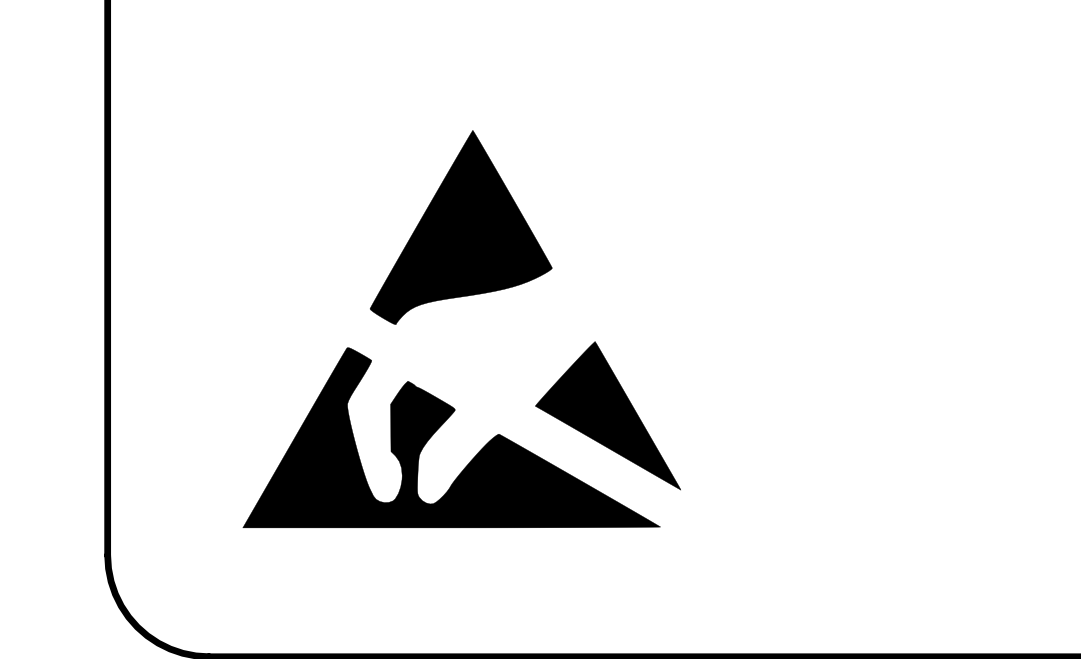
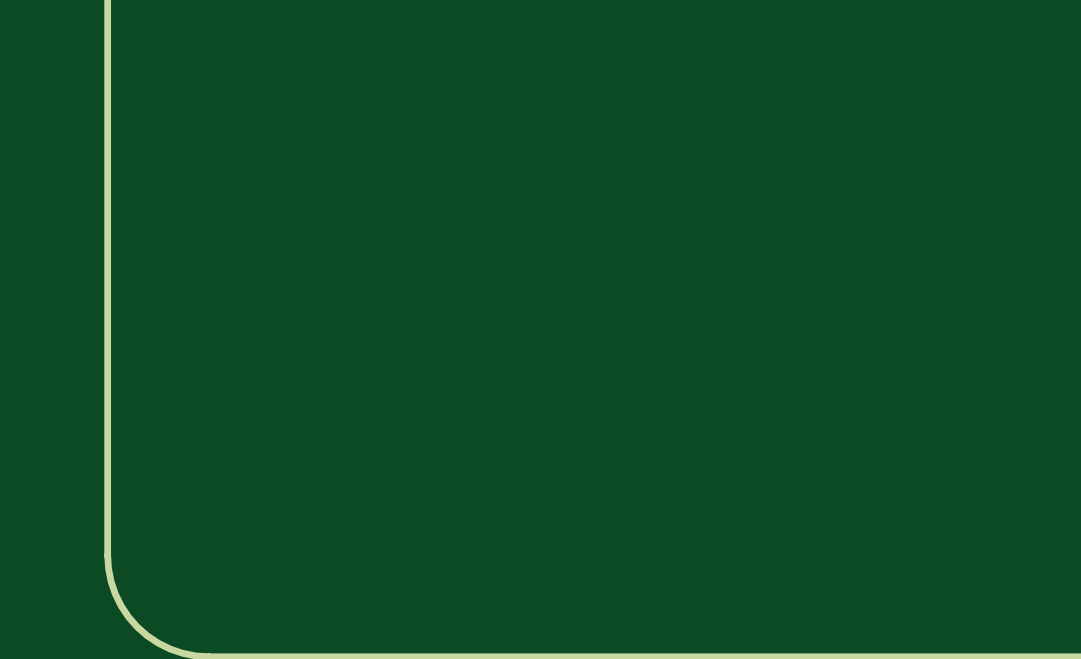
drawing: [242, 130, 682, 529] -> none

